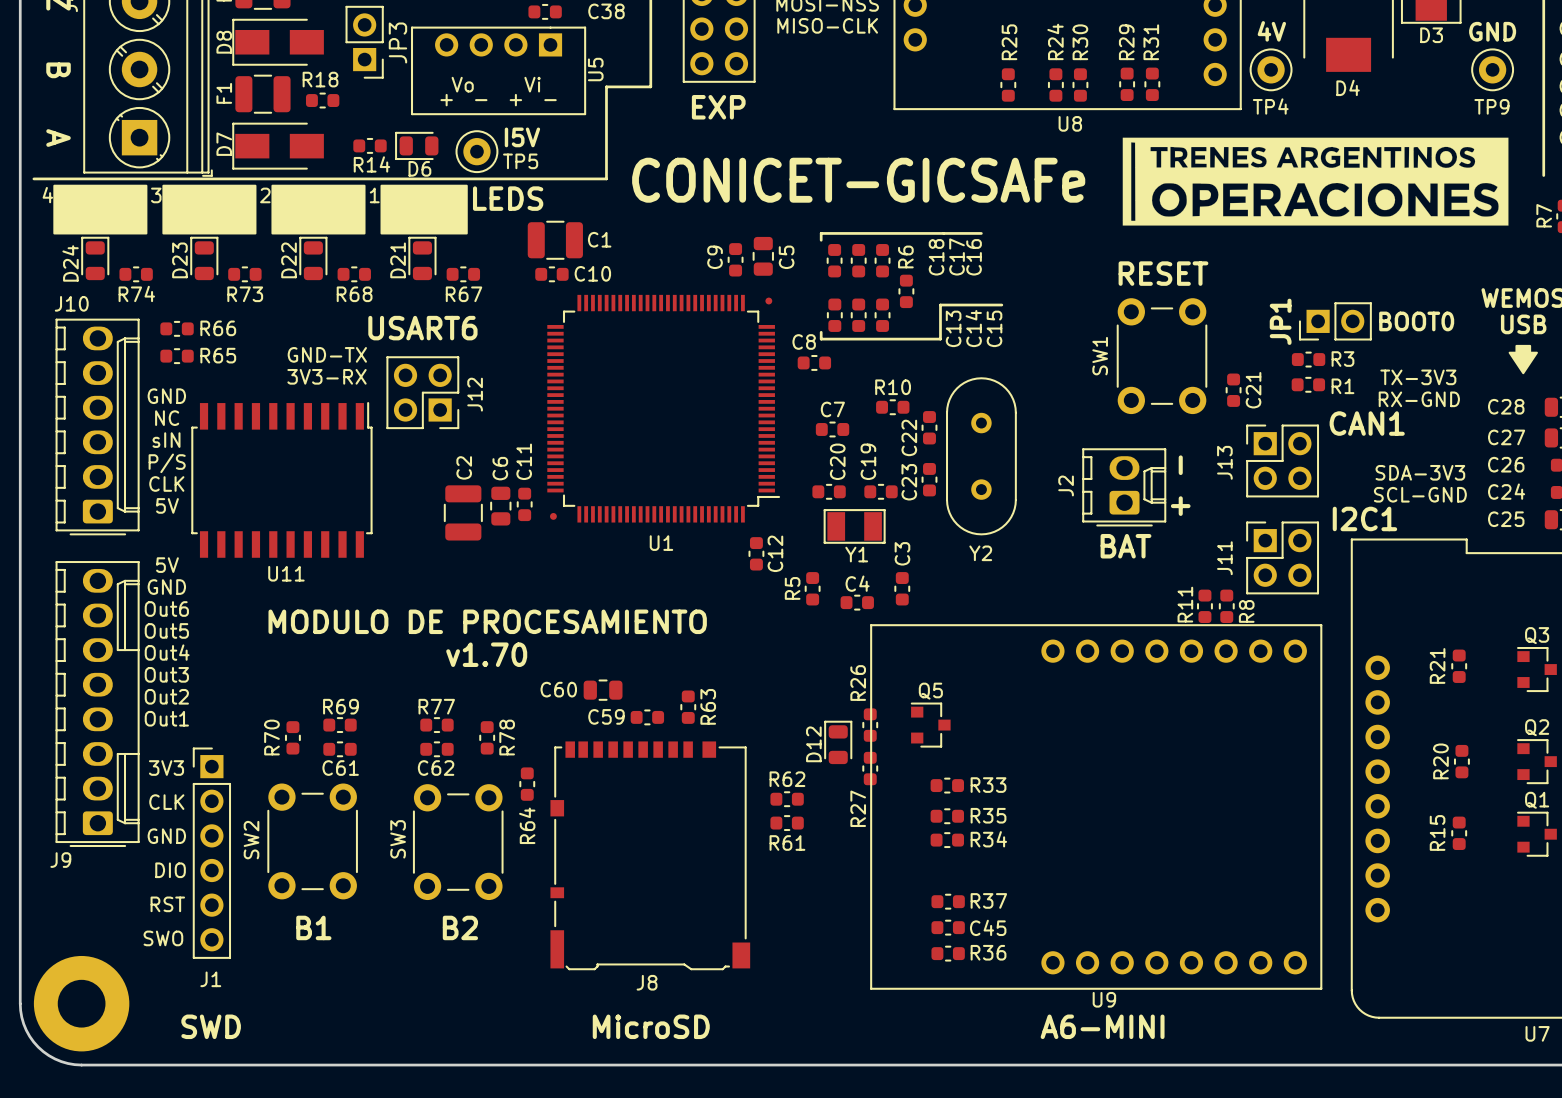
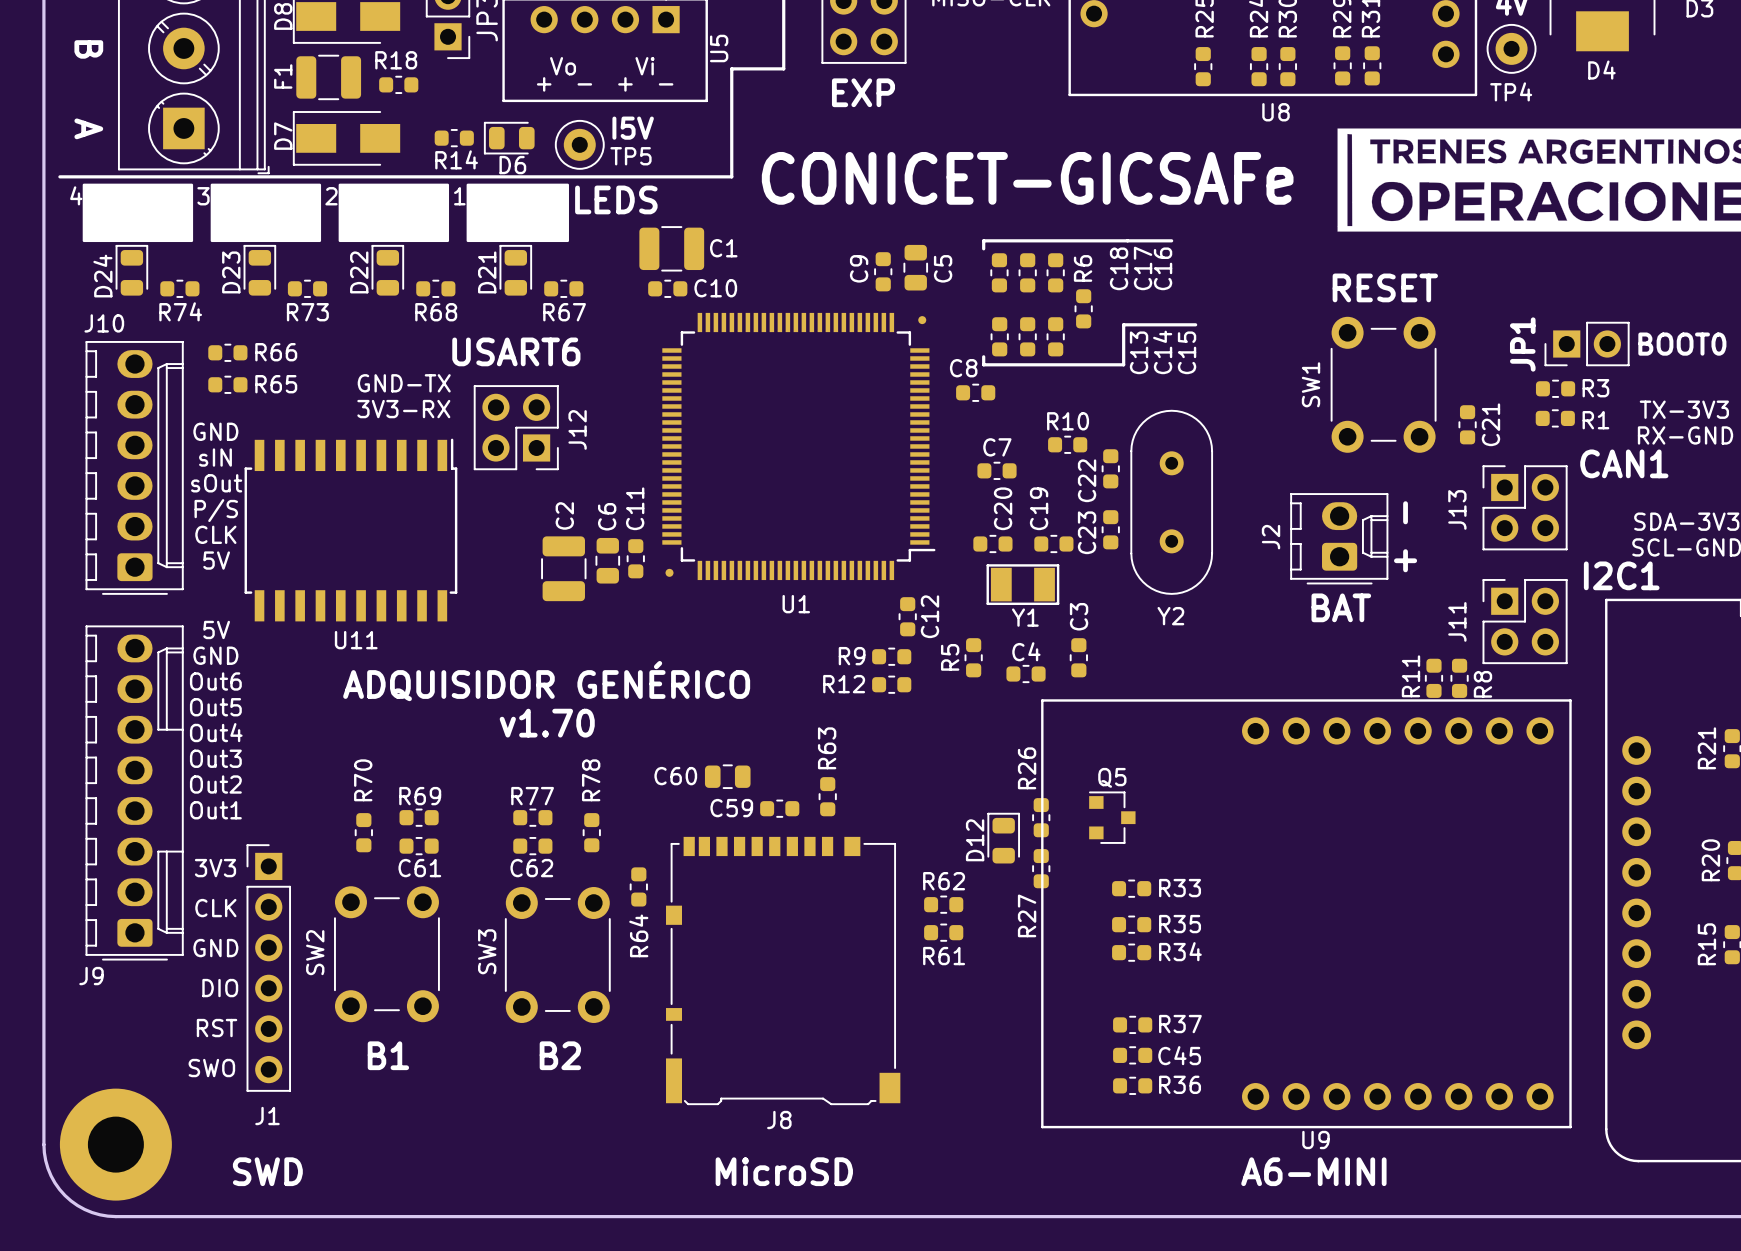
text: NC (167, 418) -> sIN (215, 457)
text: sIN (166, 440) -> sOut (216, 483)
R9: none -> (891, 656)
text: none -> ADQUISIDOR GENÉRICO (546, 681)
R12: none -> (891, 684)
text: MODULO DE PROCESAMIENTO (487, 621) -> none
text position: v1.70 (486, 654) -> v1.70 (547, 723)
R63 name position: R63 (708, 706) -> R63 (827, 748)
R70 name position: R70 (271, 737) -> R70 (363, 780)
R78 name position: R78 (507, 737) -> R78 (591, 780)

